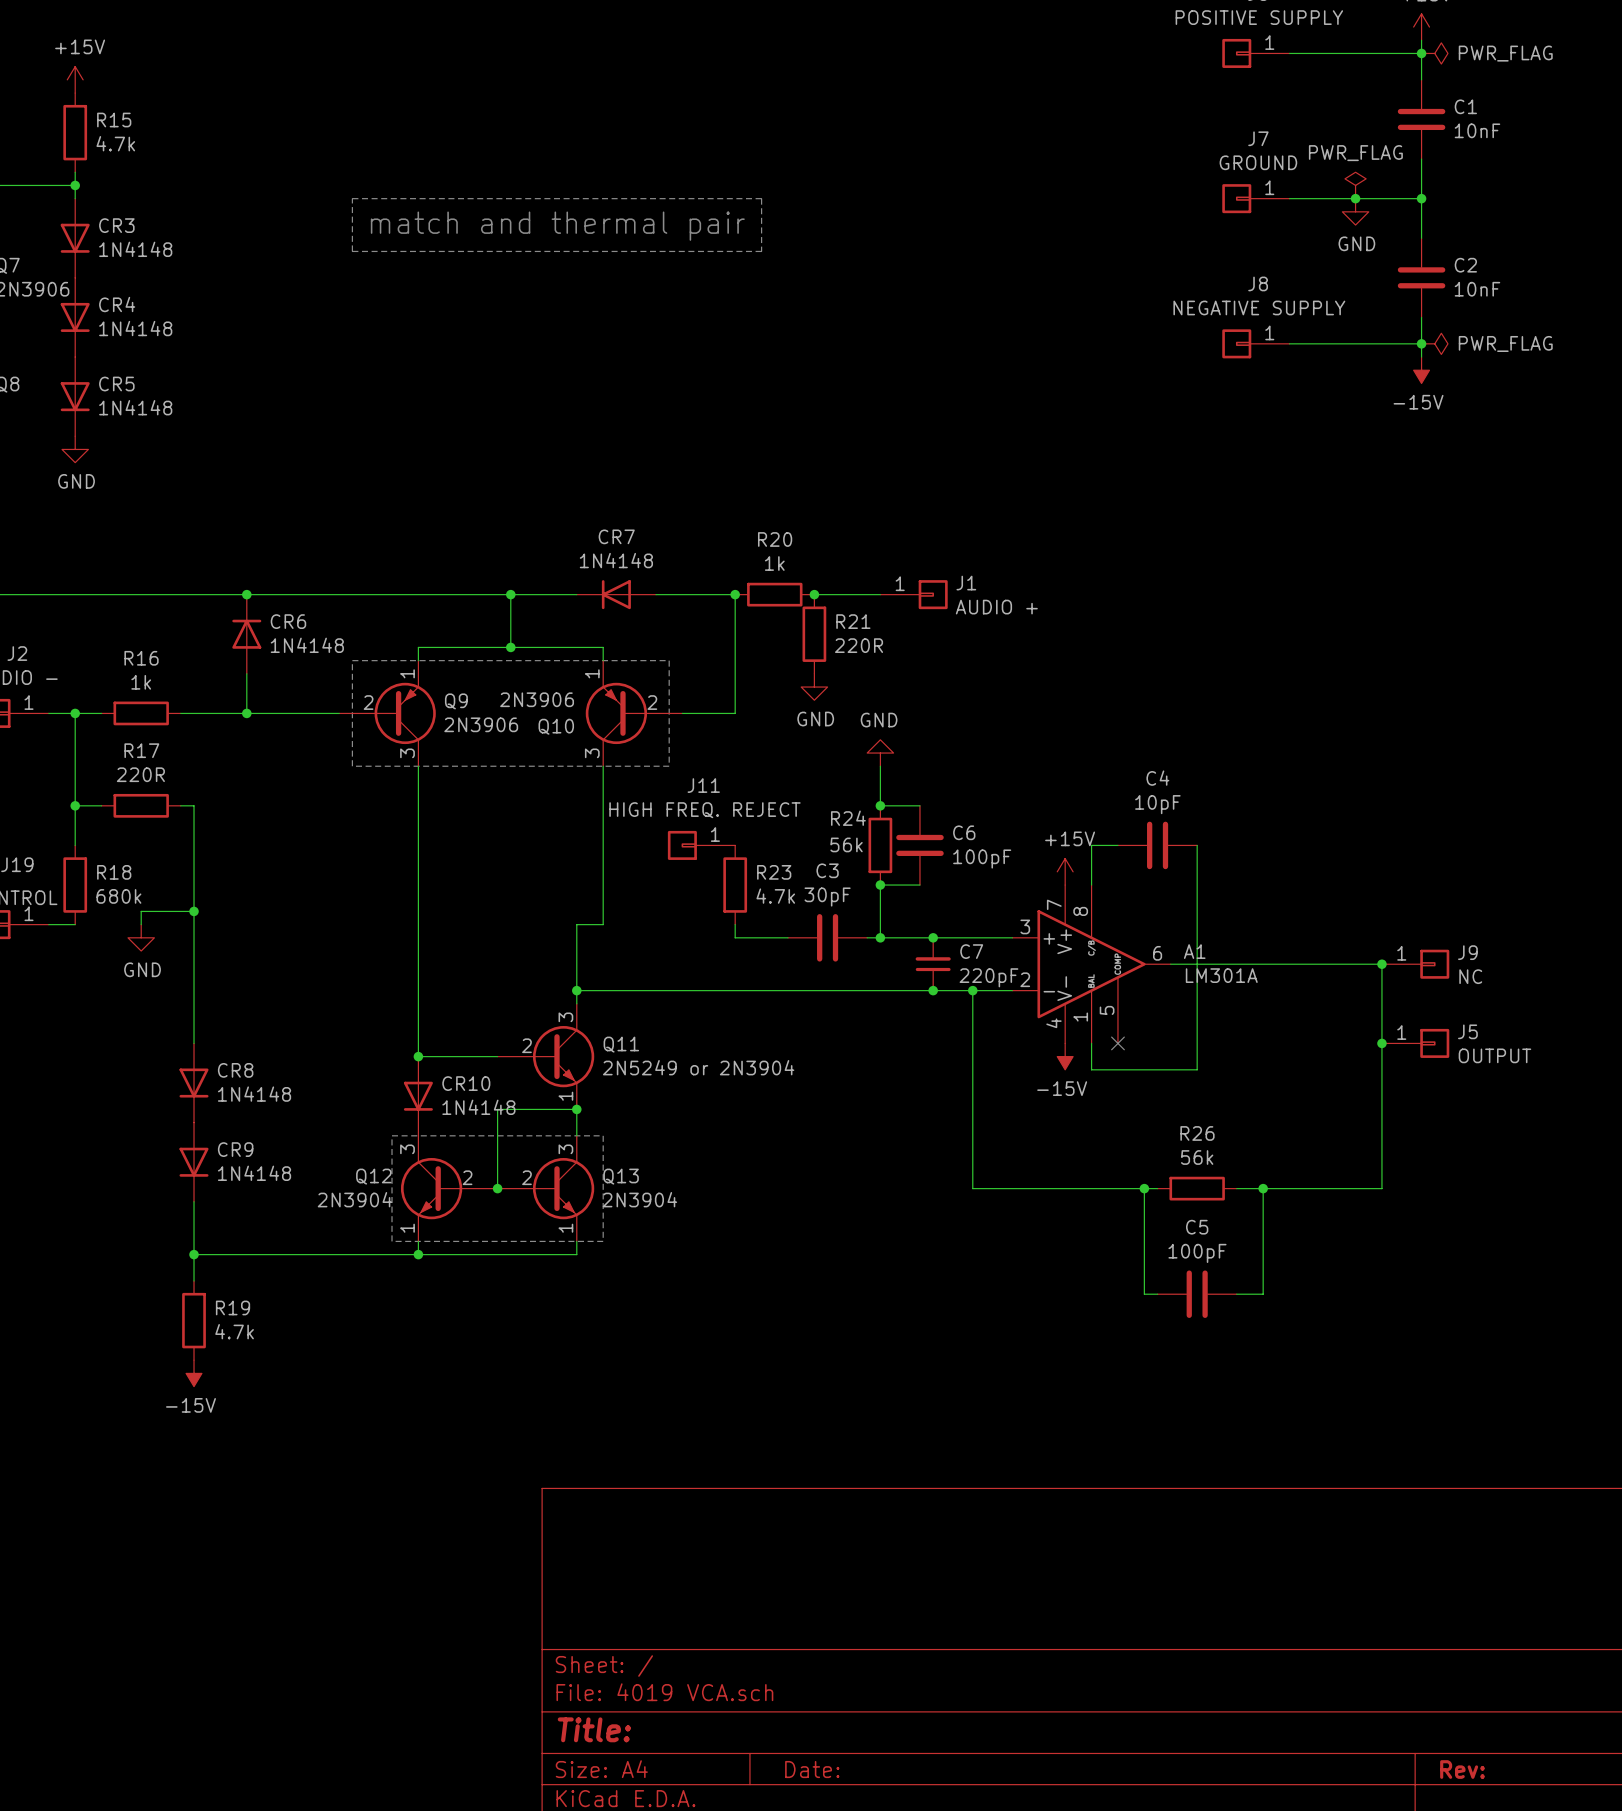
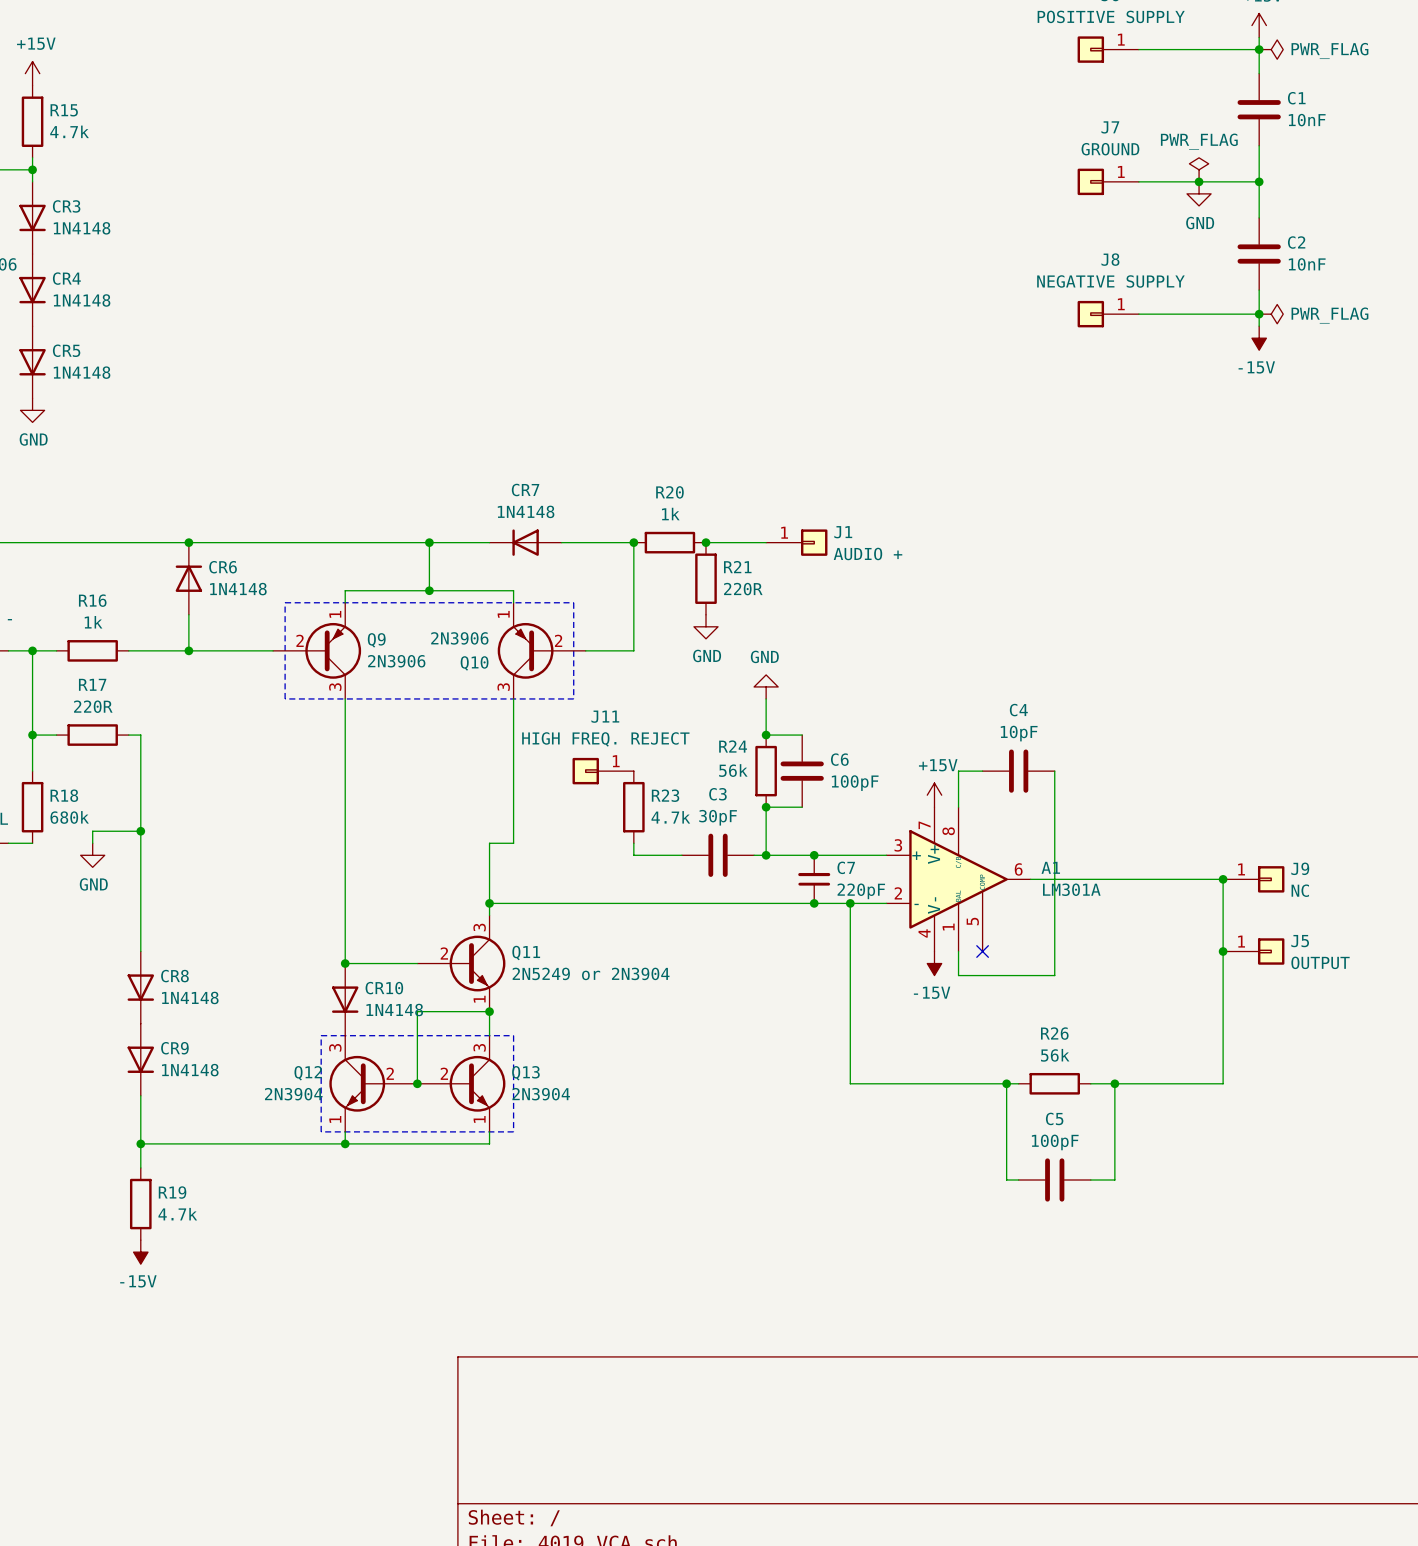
line: (352, 198) (761, 198) (761, 251) (352, 251) (352, 198) -> none
text: match and thermal pair (557, 226) -> none

